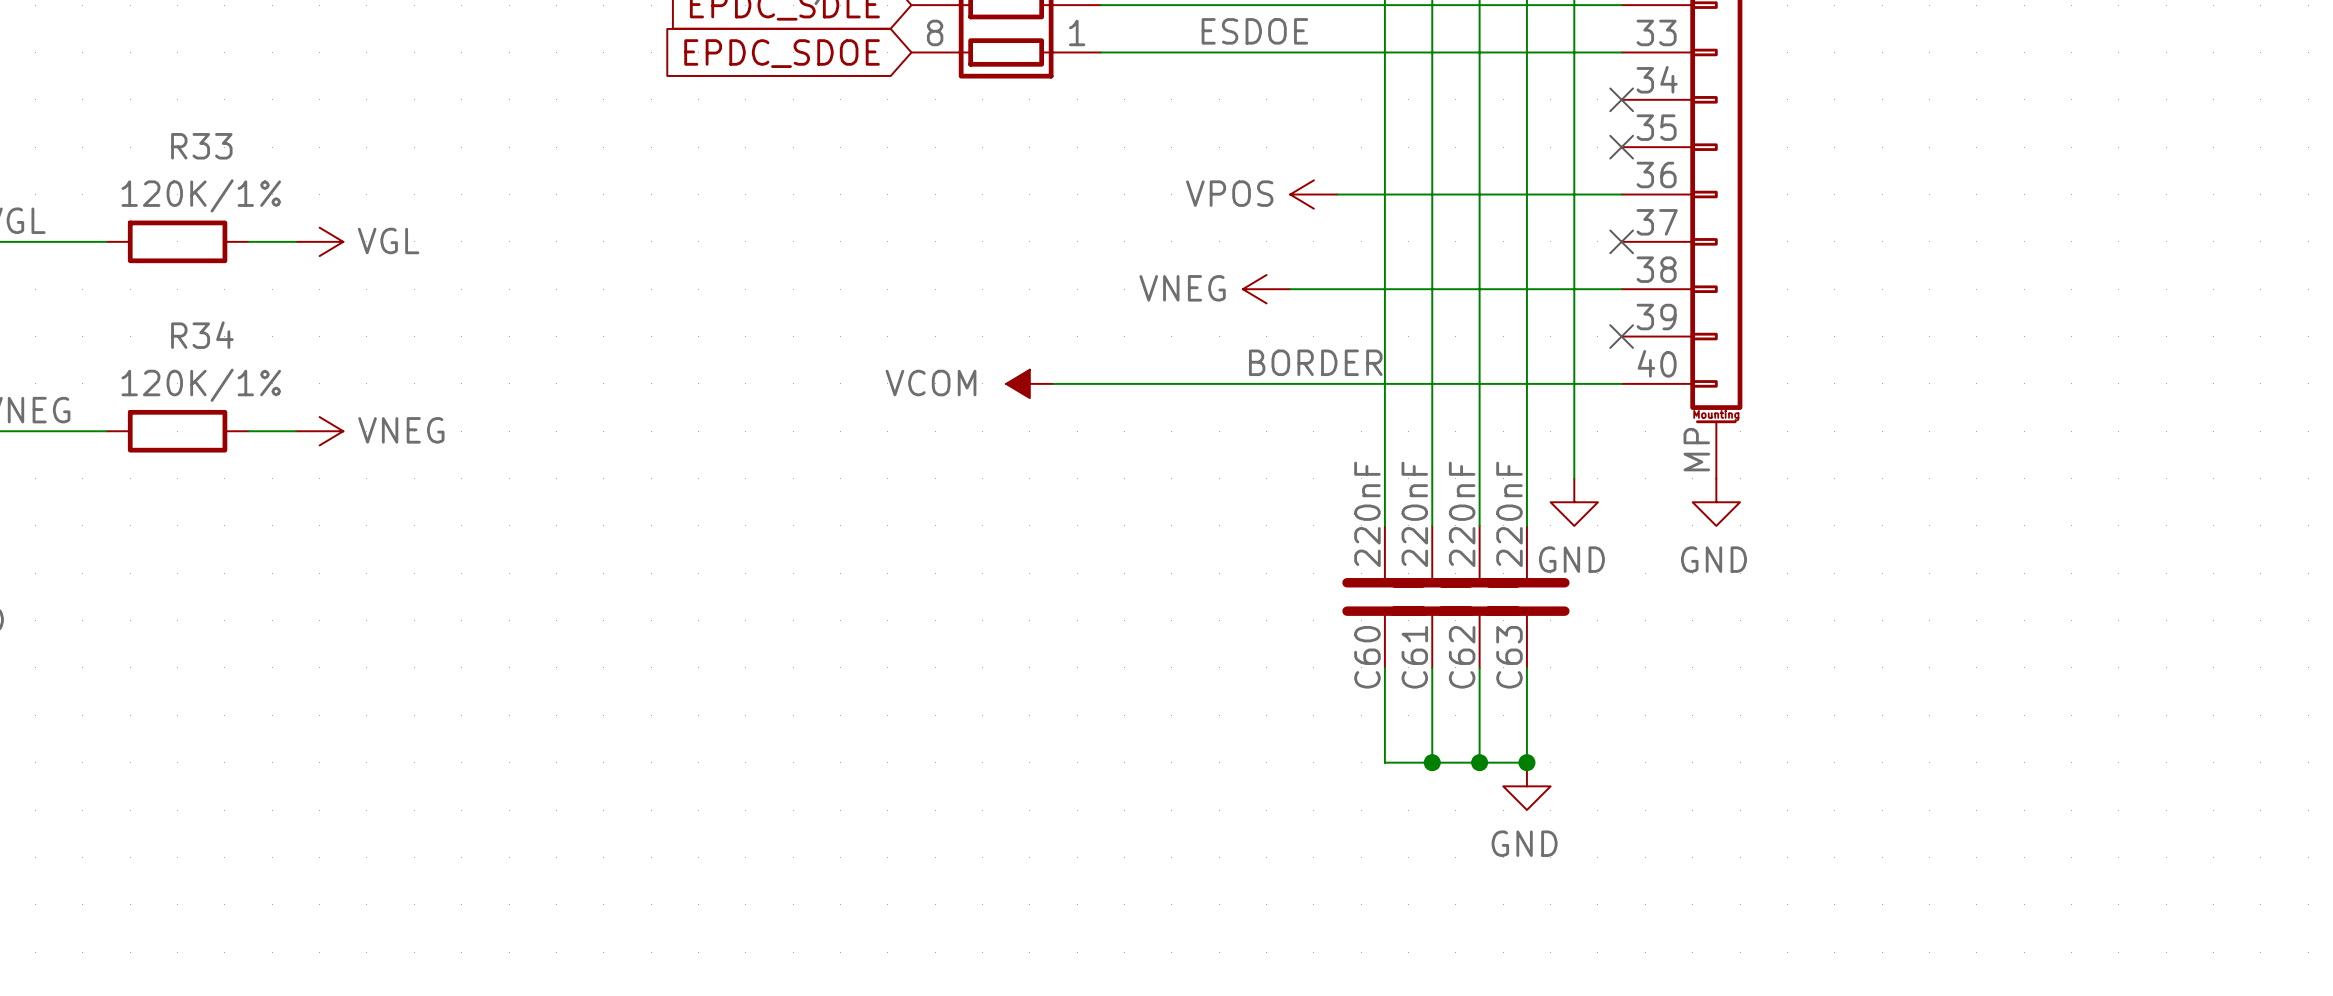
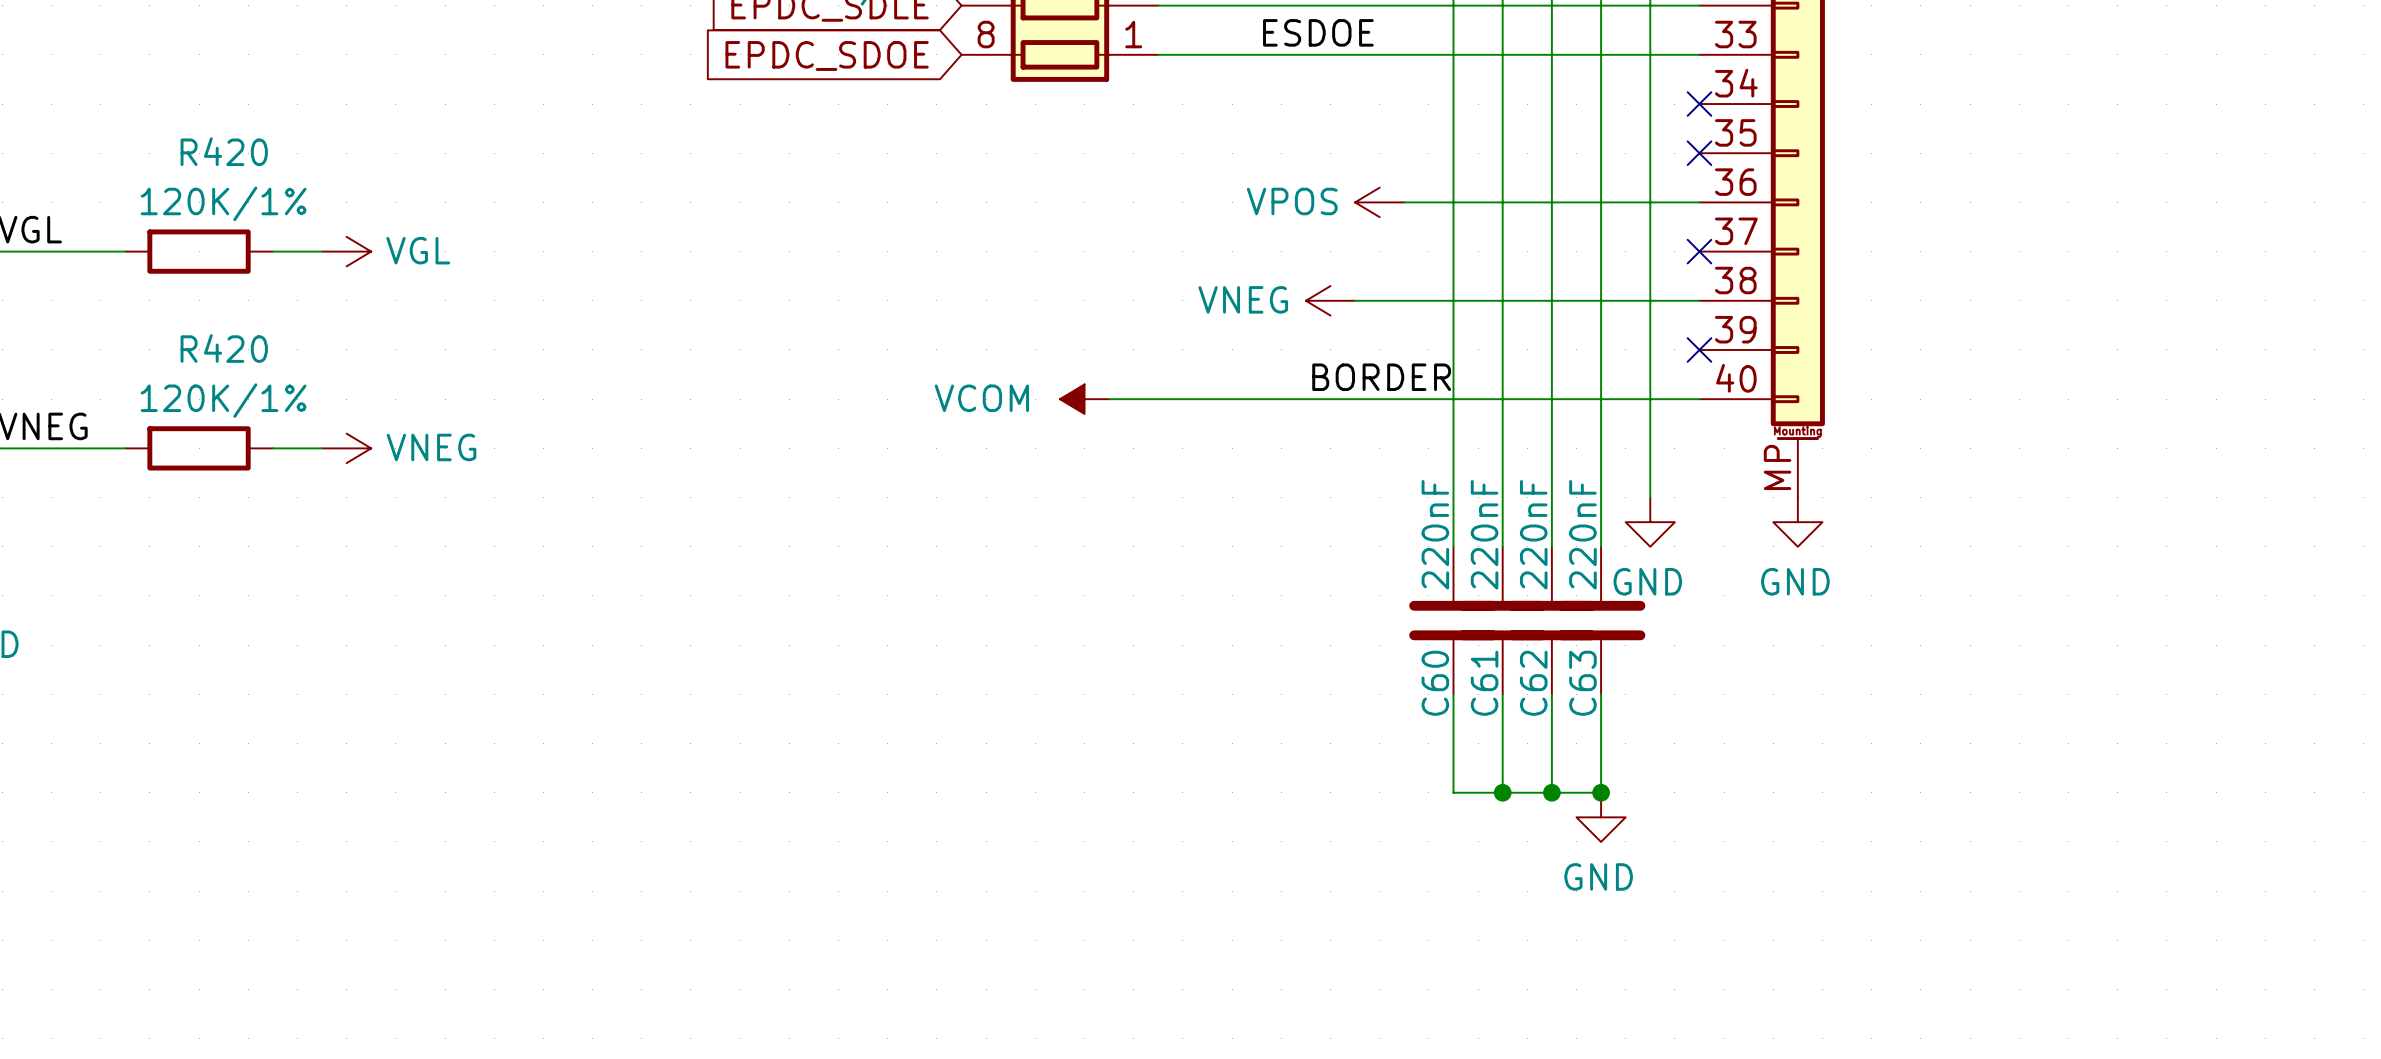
R33 name: R33 (201, 146) -> R420 (224, 151)
R34 name: R34 (202, 335) -> R420 (224, 348)

